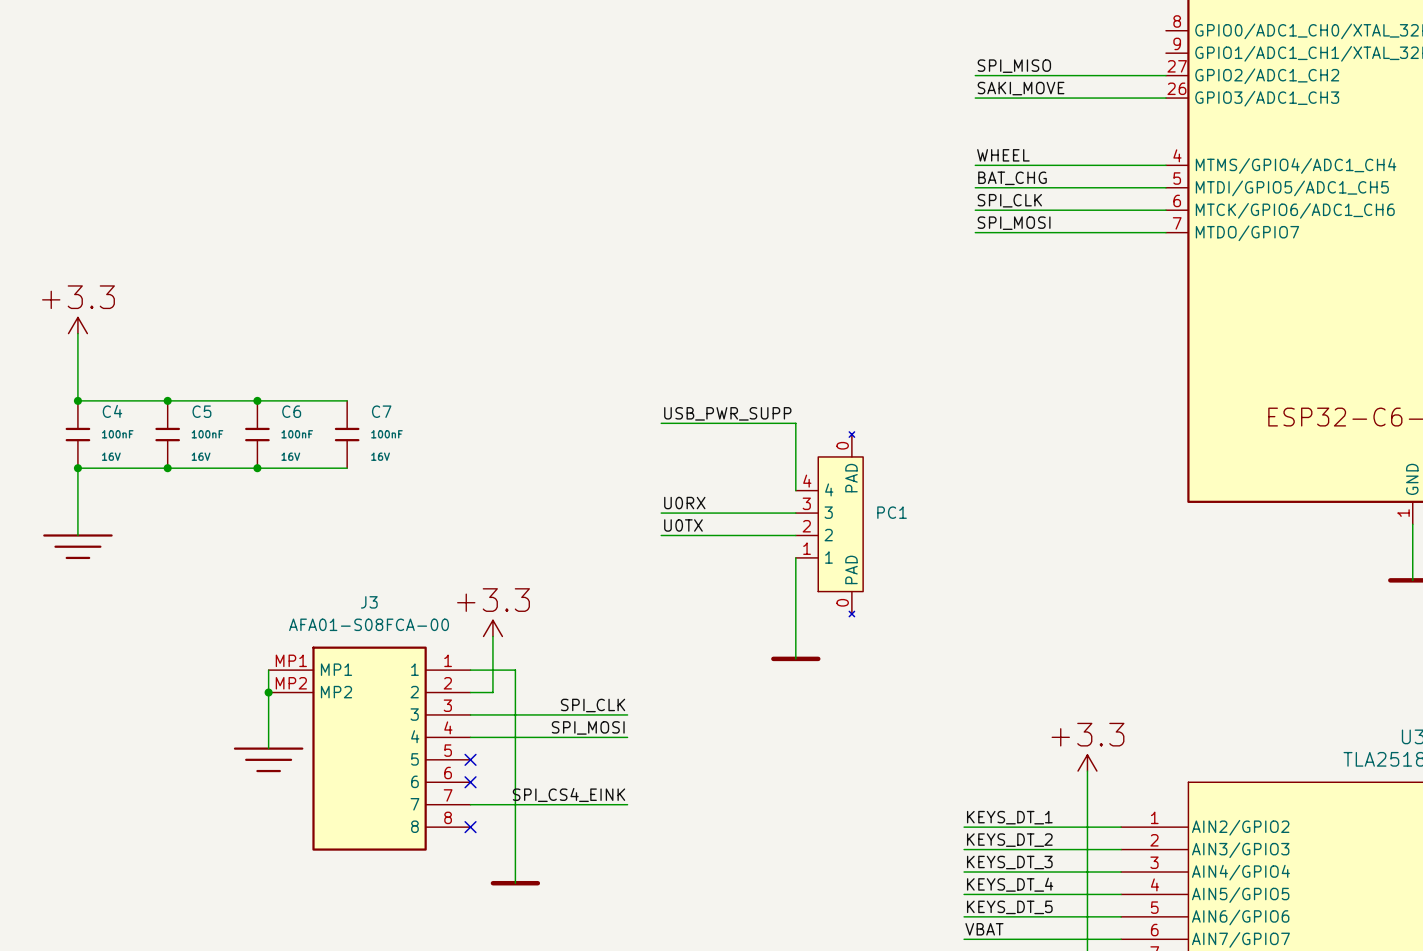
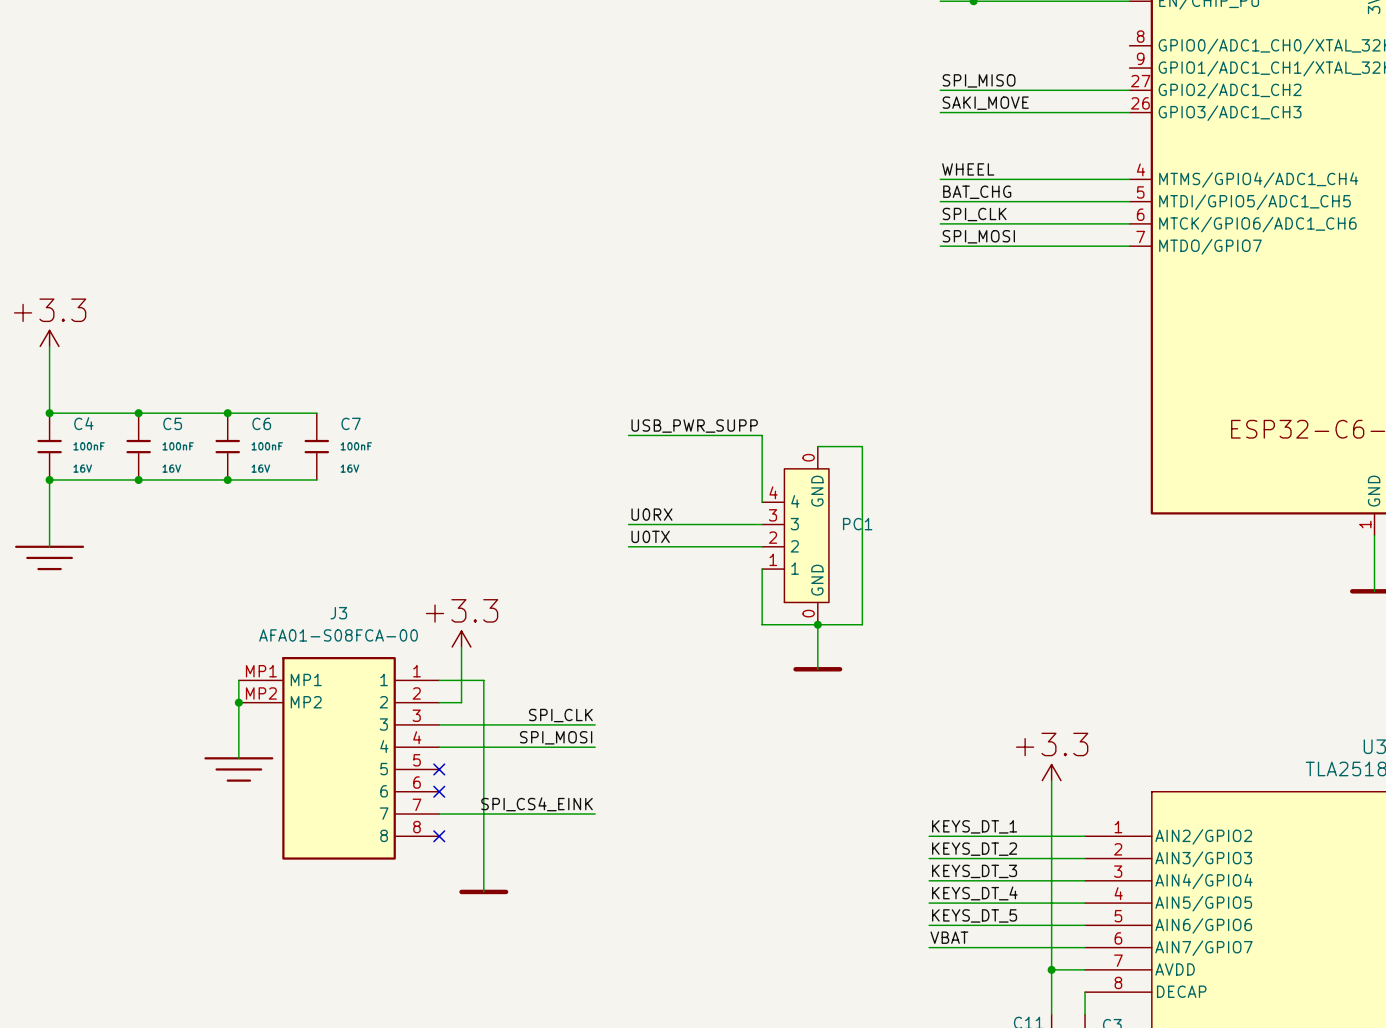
PC1 symbol: [795, 431, 864, 617] -> [762, 446, 829, 625]
wire: (795, 614) (795, 658) -> (762, 624) (862, 624) (862, 446) (817, 446)
wire: none -> (817, 624) (817, 669)
junction: none -> (817, 624)
power symbol position: (795, 658) -> (817, 669)

